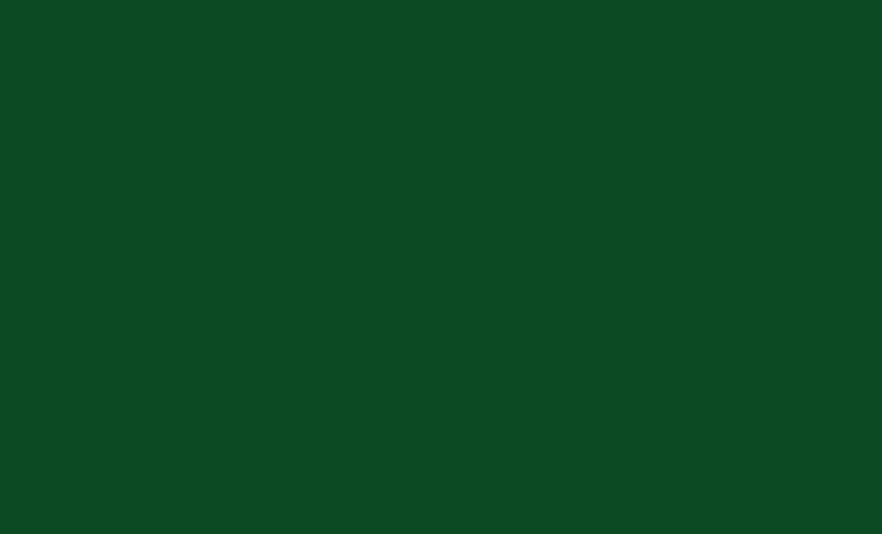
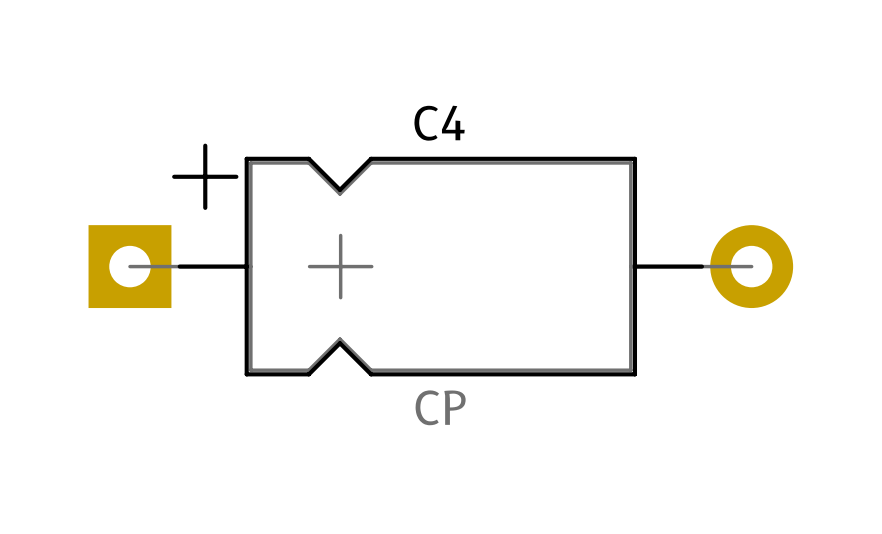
C4: none -> CP (440, 260)

